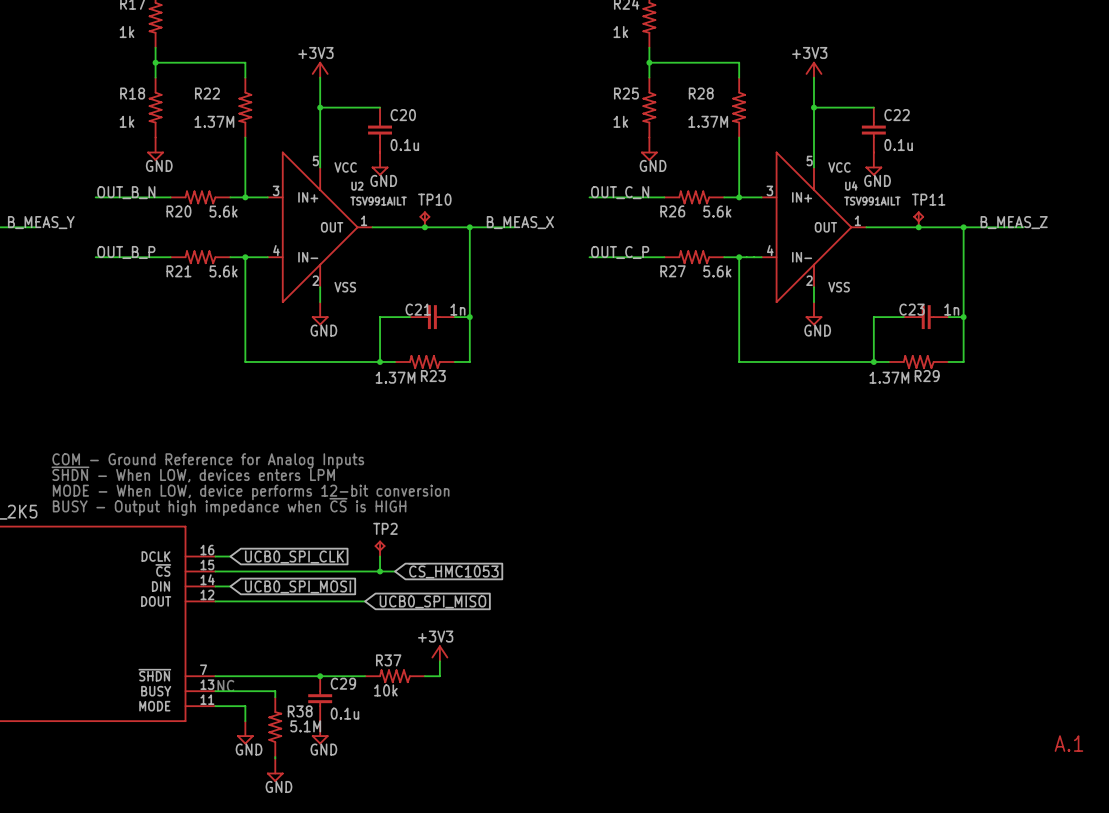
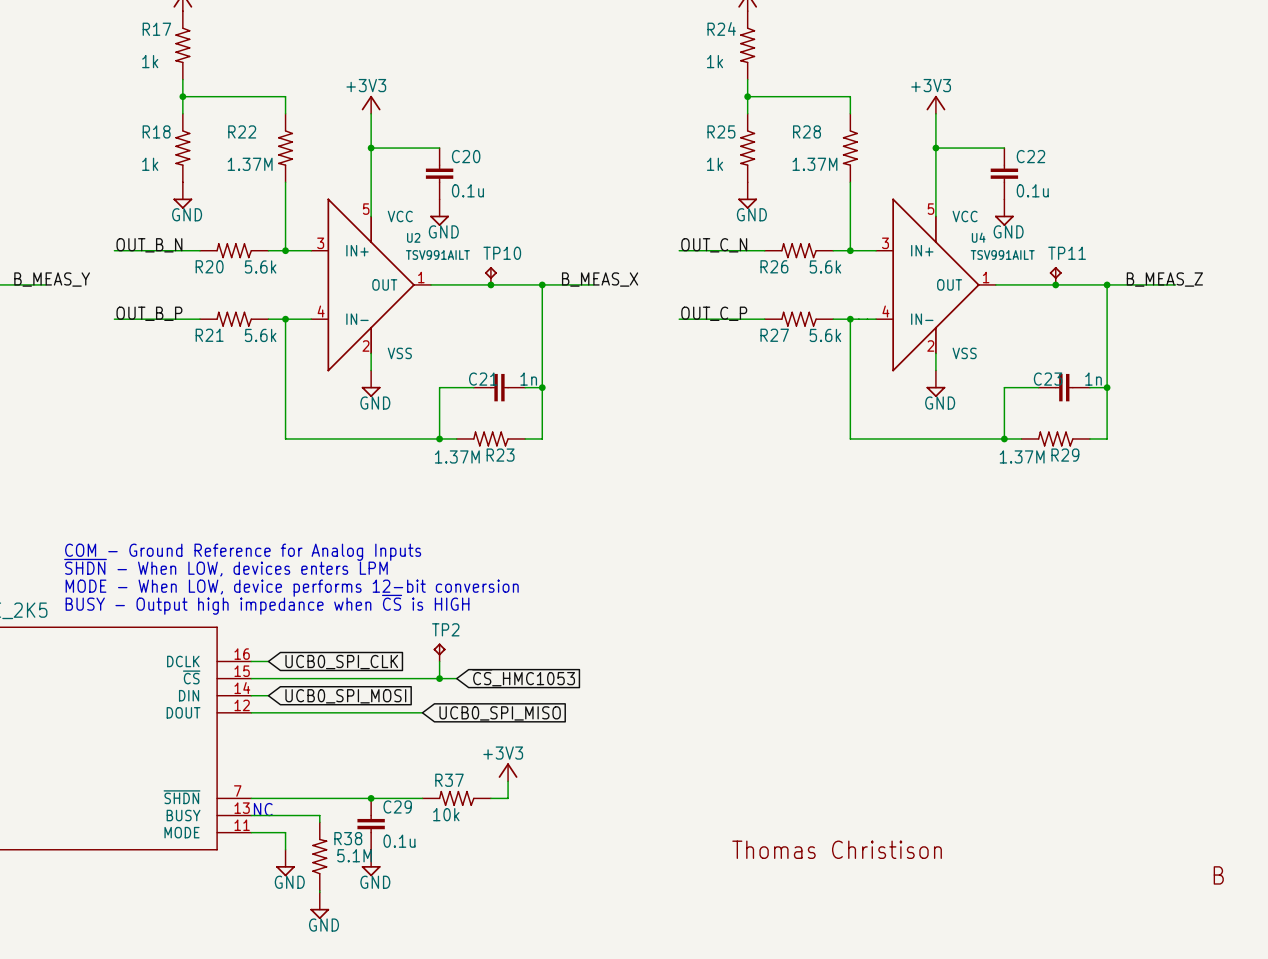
text: none -> Thomas Christison (837, 849)
text: A.1 (1068, 743) -> B (1218, 875)

